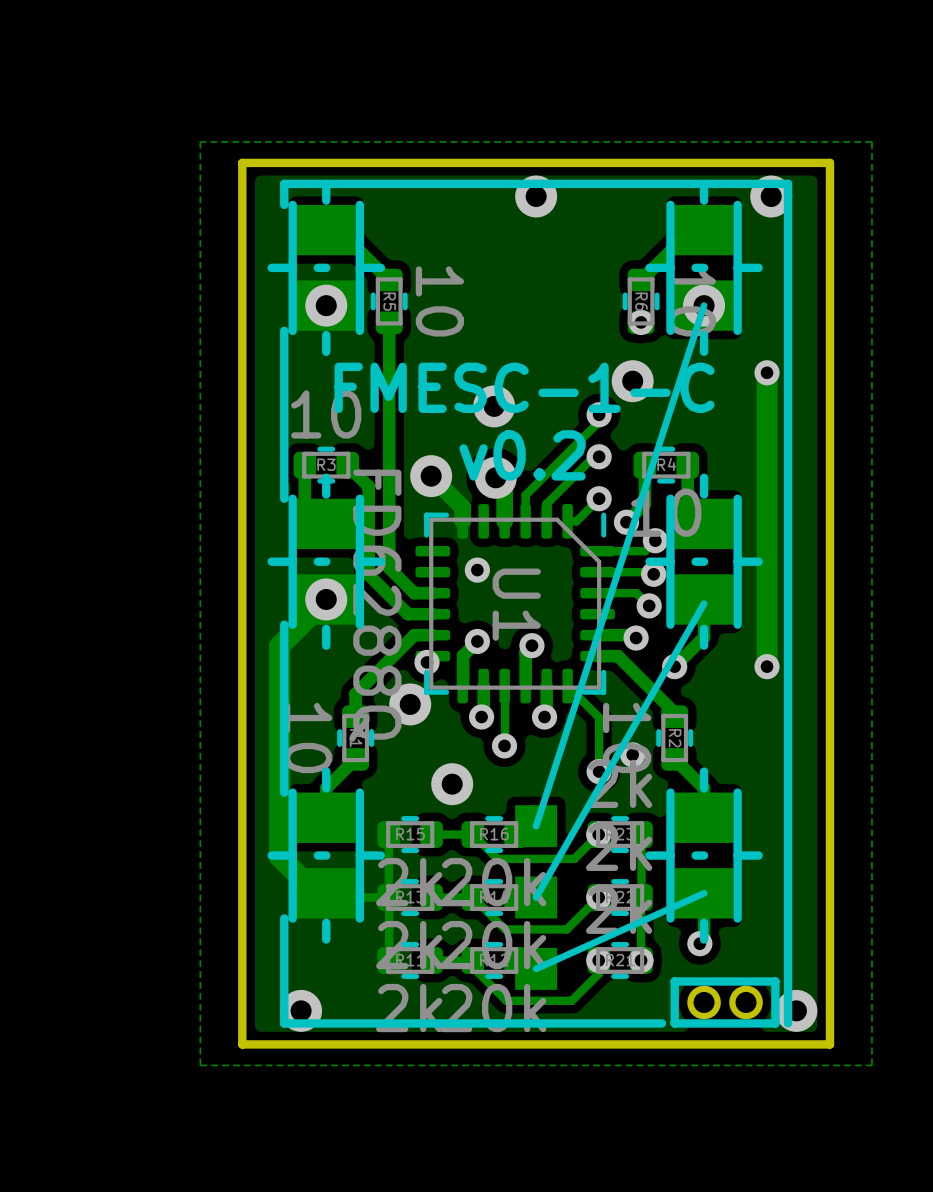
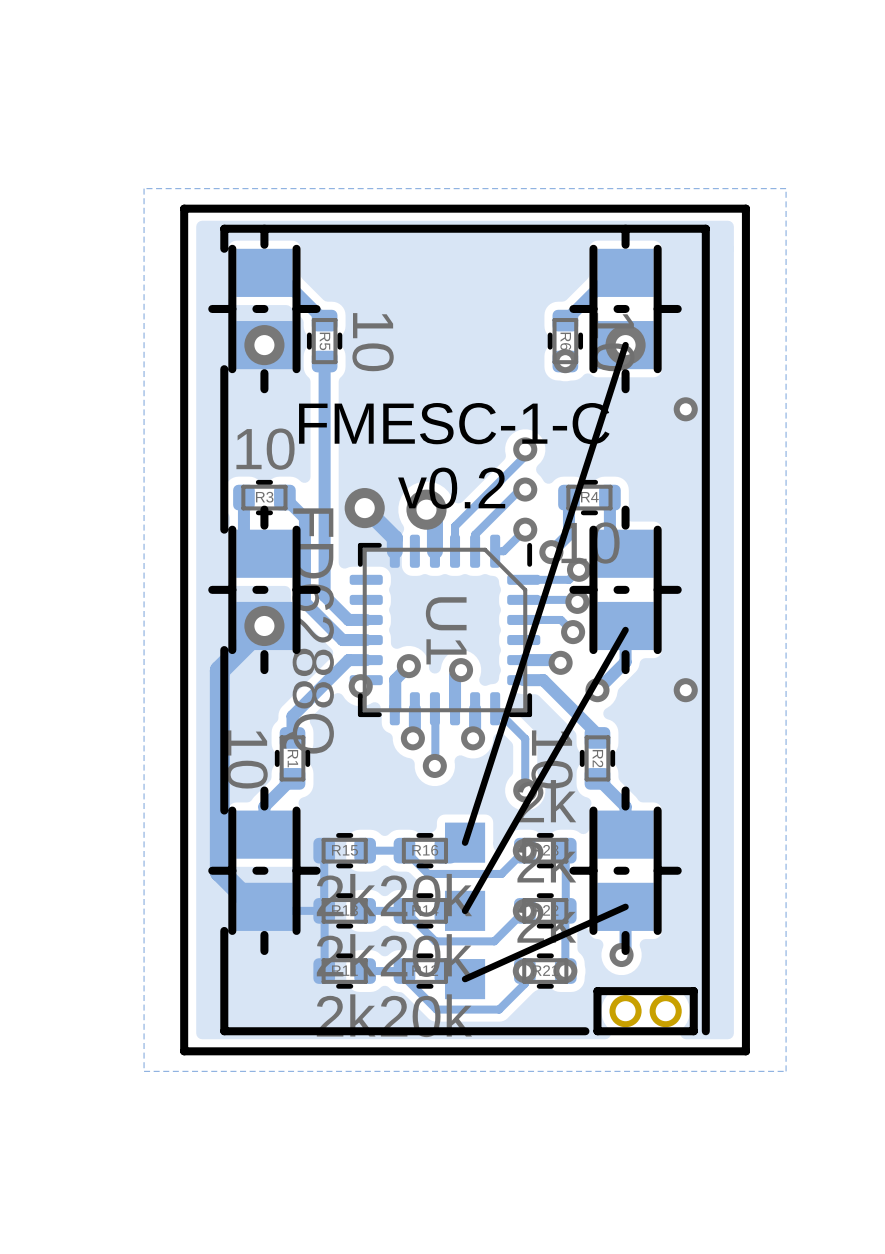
via: (536, 196) -> none
via: (771, 196) -> none
track: (767, 372) (767, 666) -> none
via: (632, 381) -> none
via: (494, 406) -> none
via: (477, 570) -> none
via: (410, 704) -> none
via: (632, 754) -> none
via: (452, 784) -> none
via: (301, 1010) -> none
via: (796, 1010) -> none

